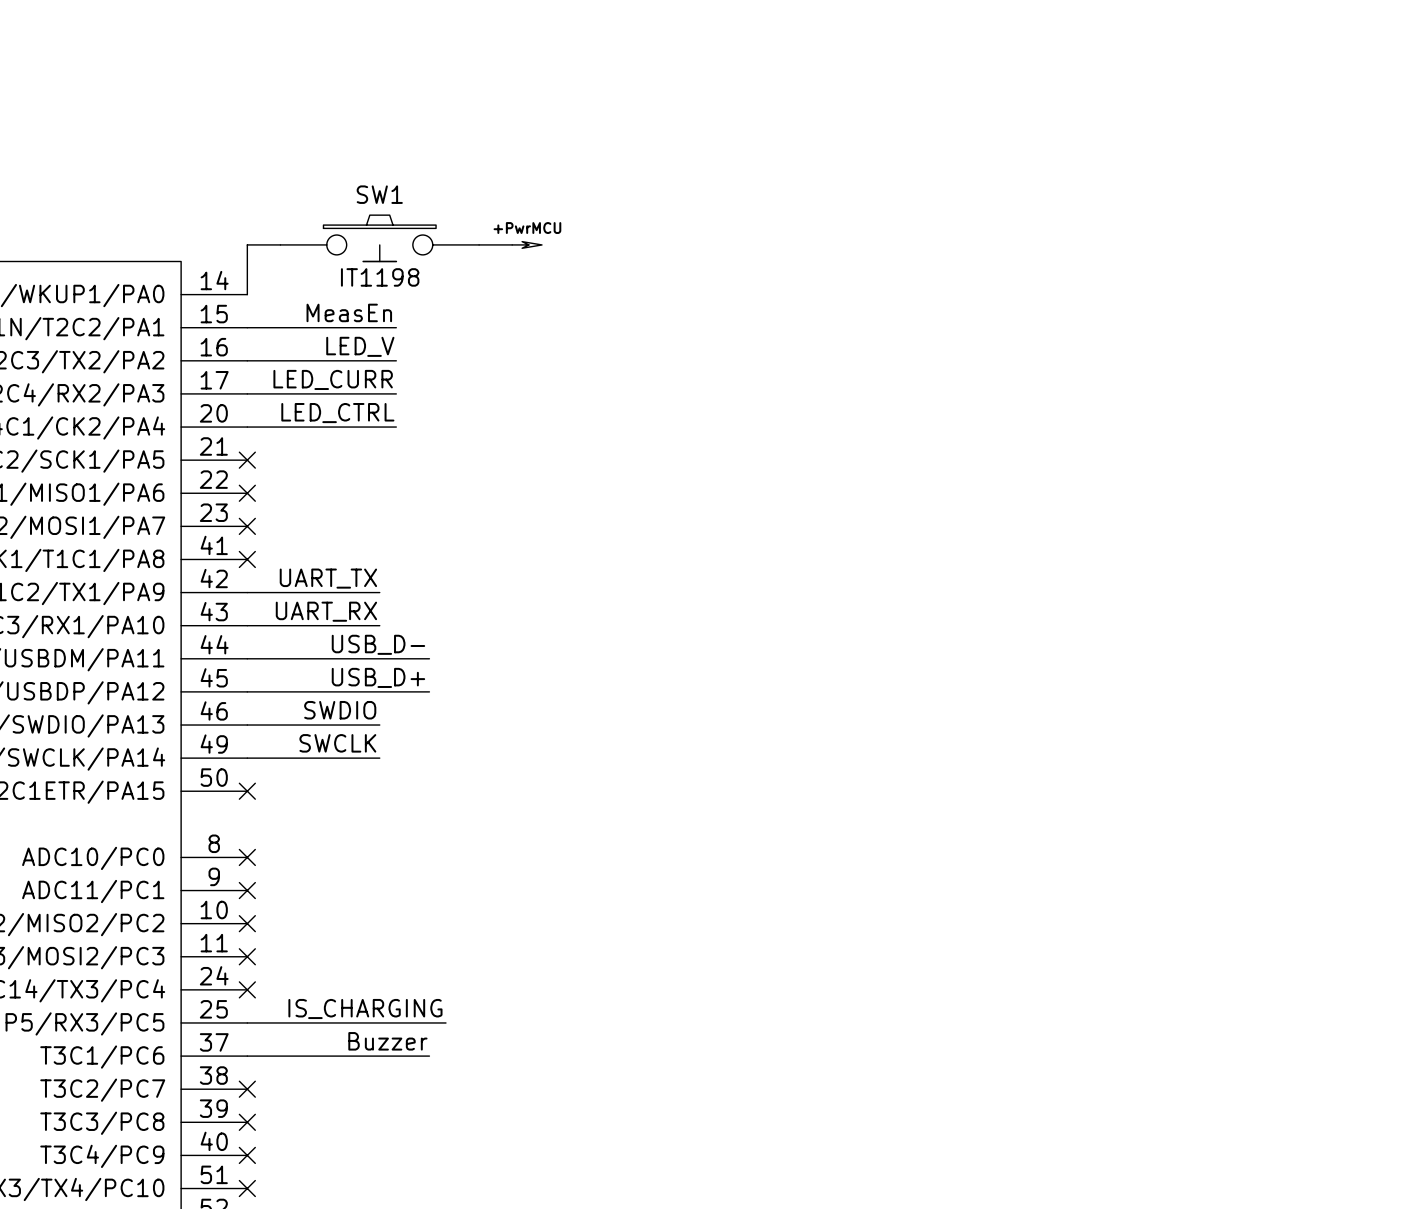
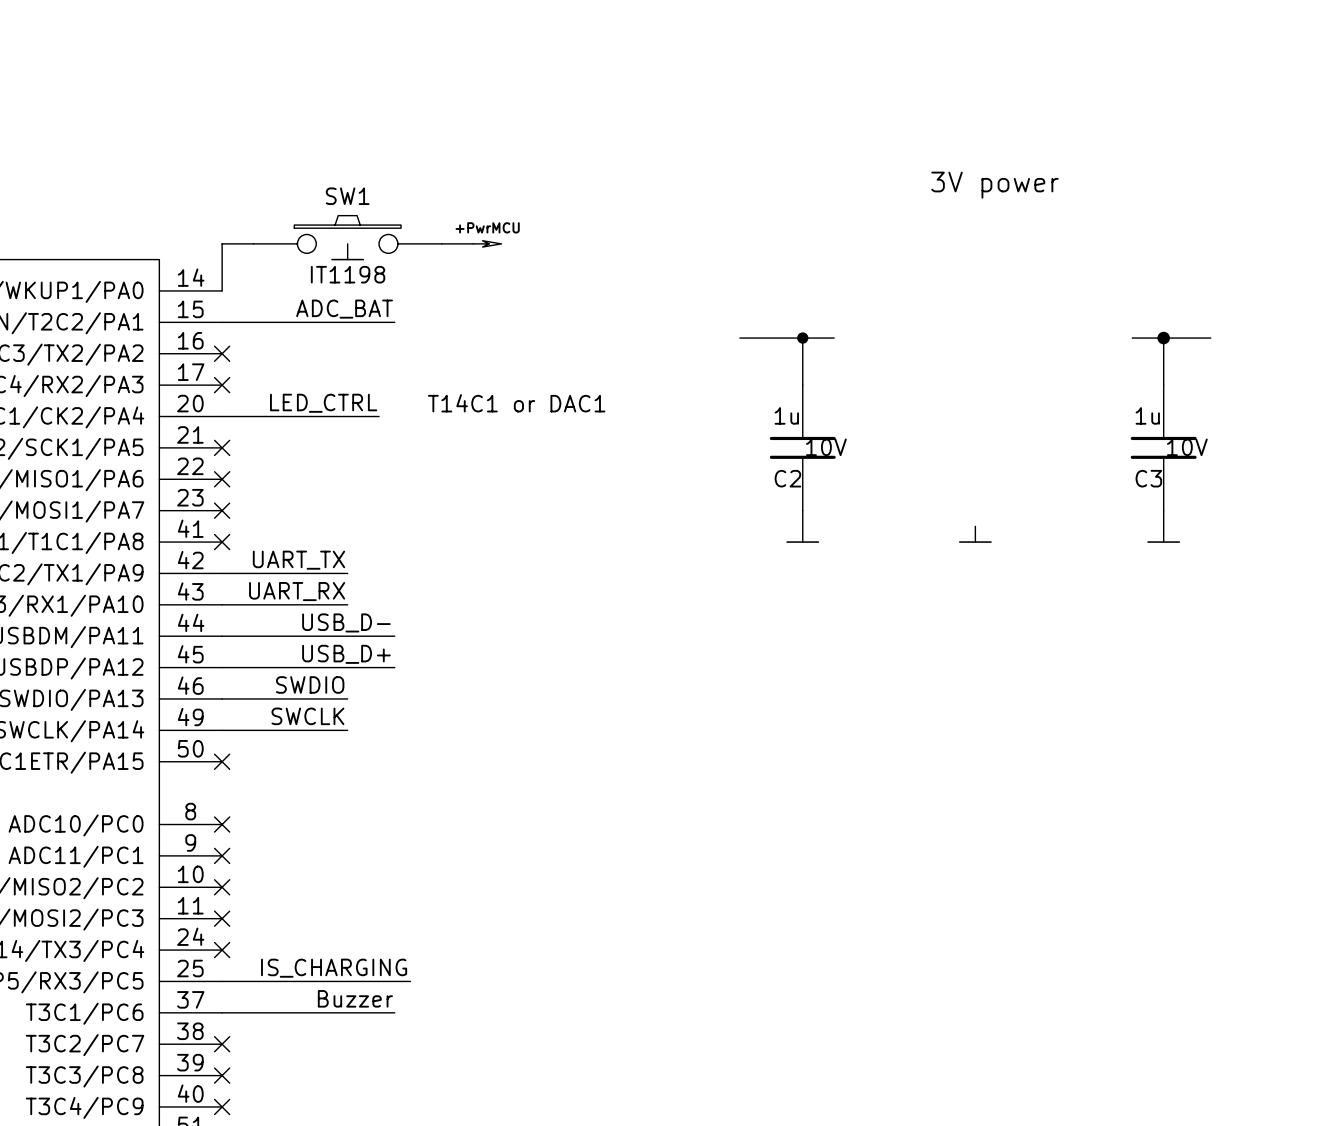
text: none -> 3V power (994, 185)
label: MeasEn (349, 312) -> none
label: none -> ADC_BAT (344, 309)
wire: none -> (363, 322) (394, 322)
wire: none -> (739, 338) (834, 338)
wire: none -> (802, 338) (802, 385)
junction: none -> (802, 338)
wire: none -> (1132, 338) (1210, 338)
wire: none -> (1163, 338) (1163, 385)
junction: none -> (1163, 338)
label: LED_V (360, 346) -> none
wire: (247, 360) (396, 360) -> none
no-connect mark: none -> (222, 353)
label: LED_CURR (333, 379) -> none
wire: (247, 393) (396, 393) -> none
no-connect mark: none -> (222, 385)
label position: LED_CTRL (337, 413) -> LED_CTRL (323, 403)
text: none -> T14C1 or DAC1 (516, 403)
wire: none -> (363, 416) (379, 416)
C2: none -> 1u (802, 447)
C3: none -> 1u (1163, 447)
wire: none -> (802, 510) (802, 542)
wire: none -> (1163, 510) (1163, 542)
wire: none -> (975, 526) (975, 542)
power symbol: none -> (802, 542)
power symbol: none -> (975, 542)
power symbol: none -> (1163, 542)

